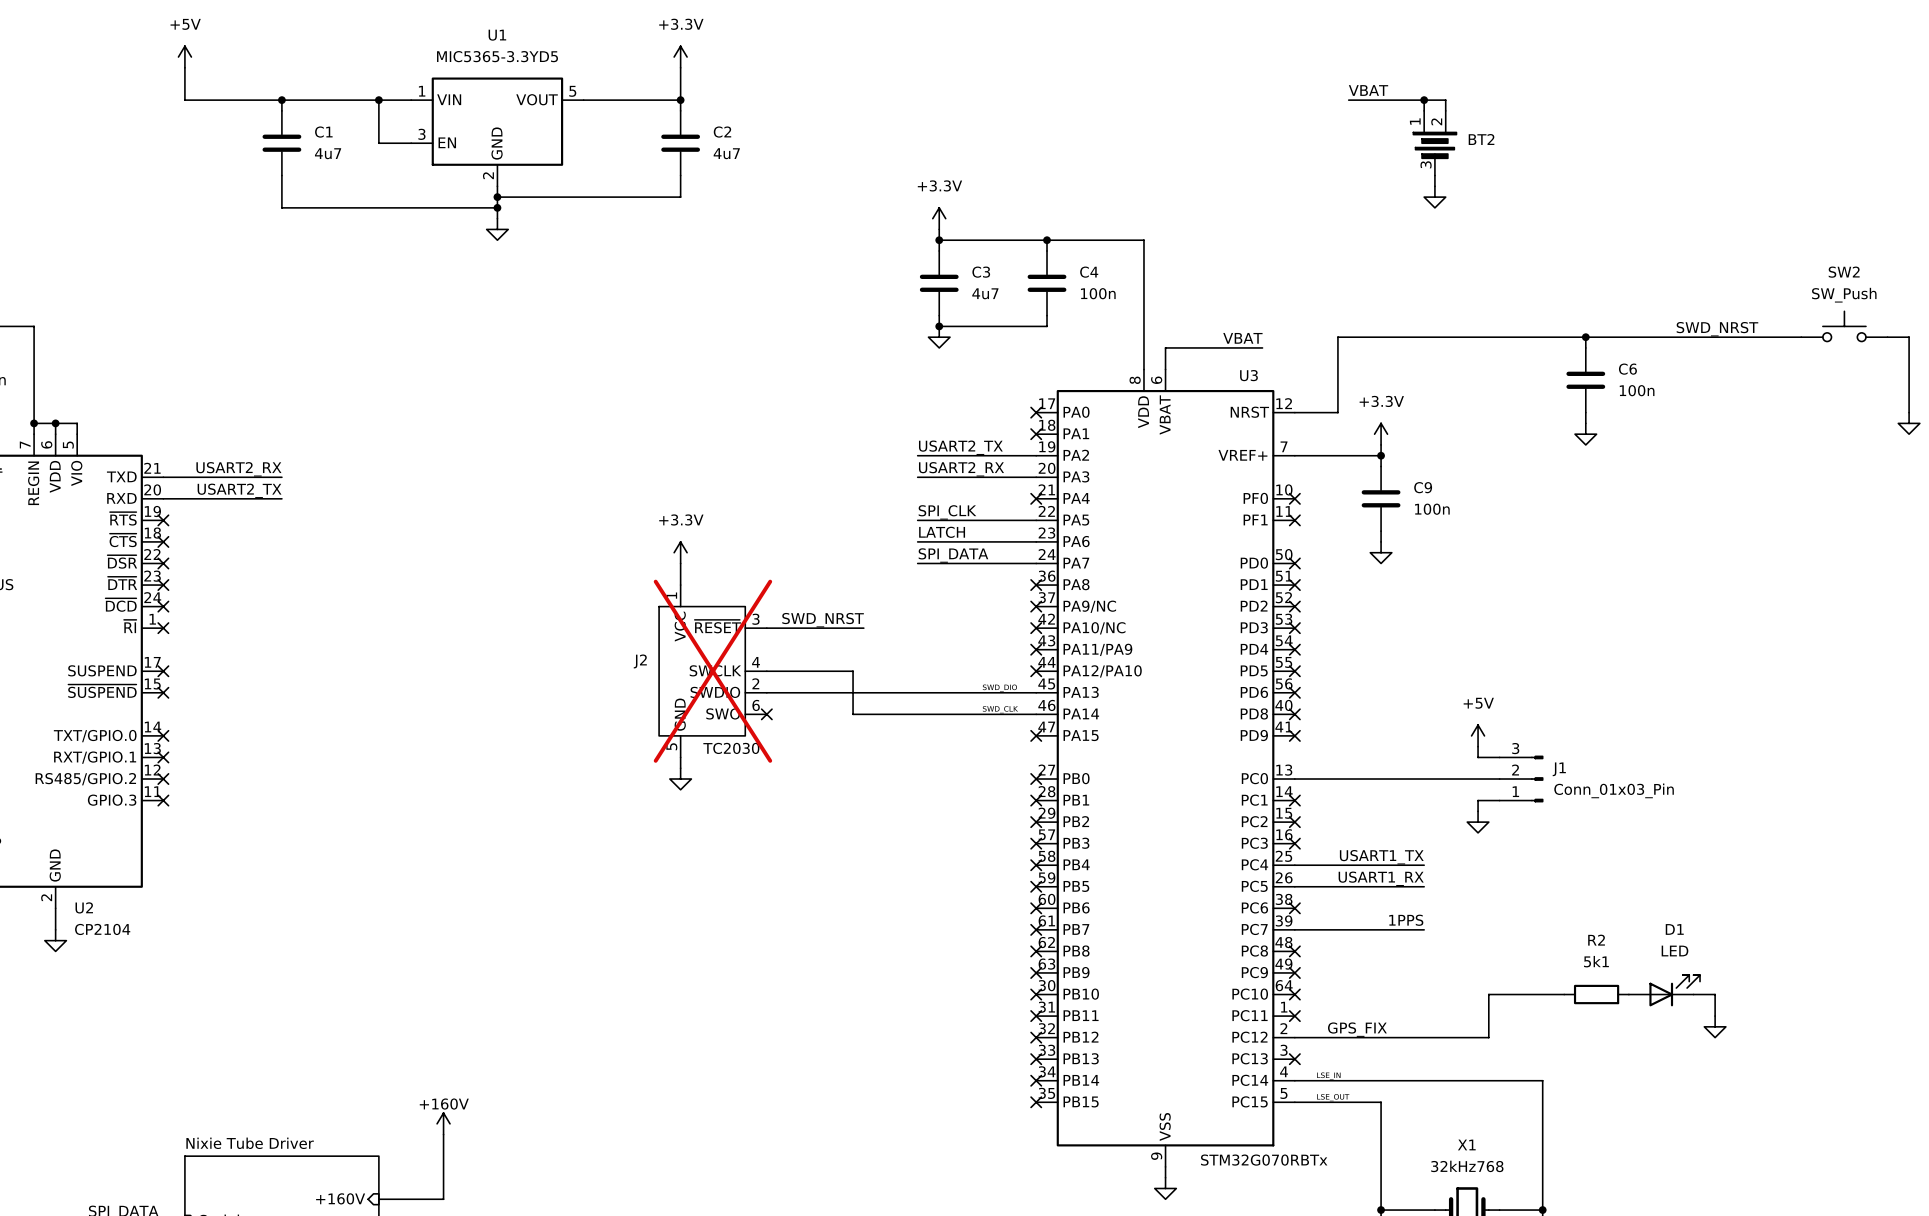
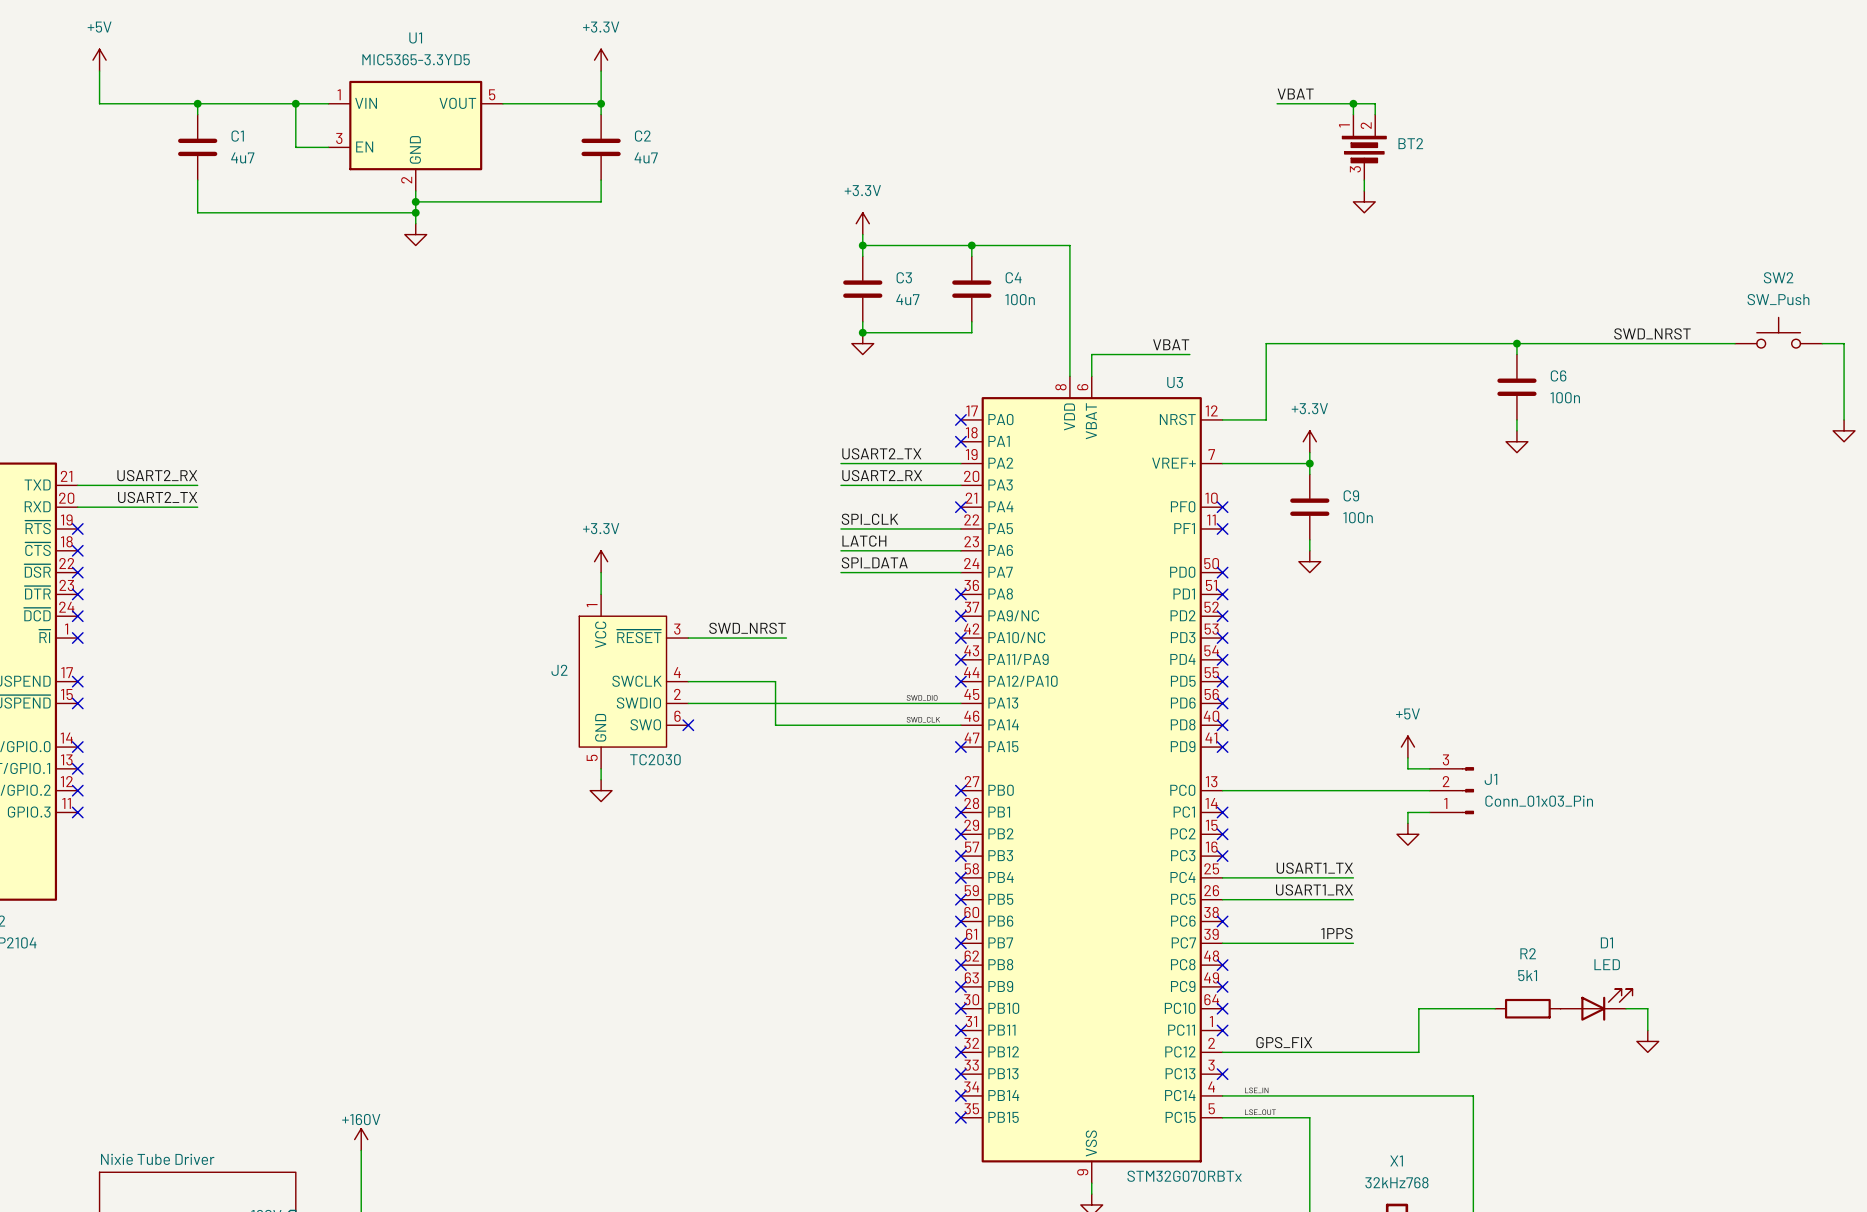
J2 do-not-place cross: (712, 671) -> none

